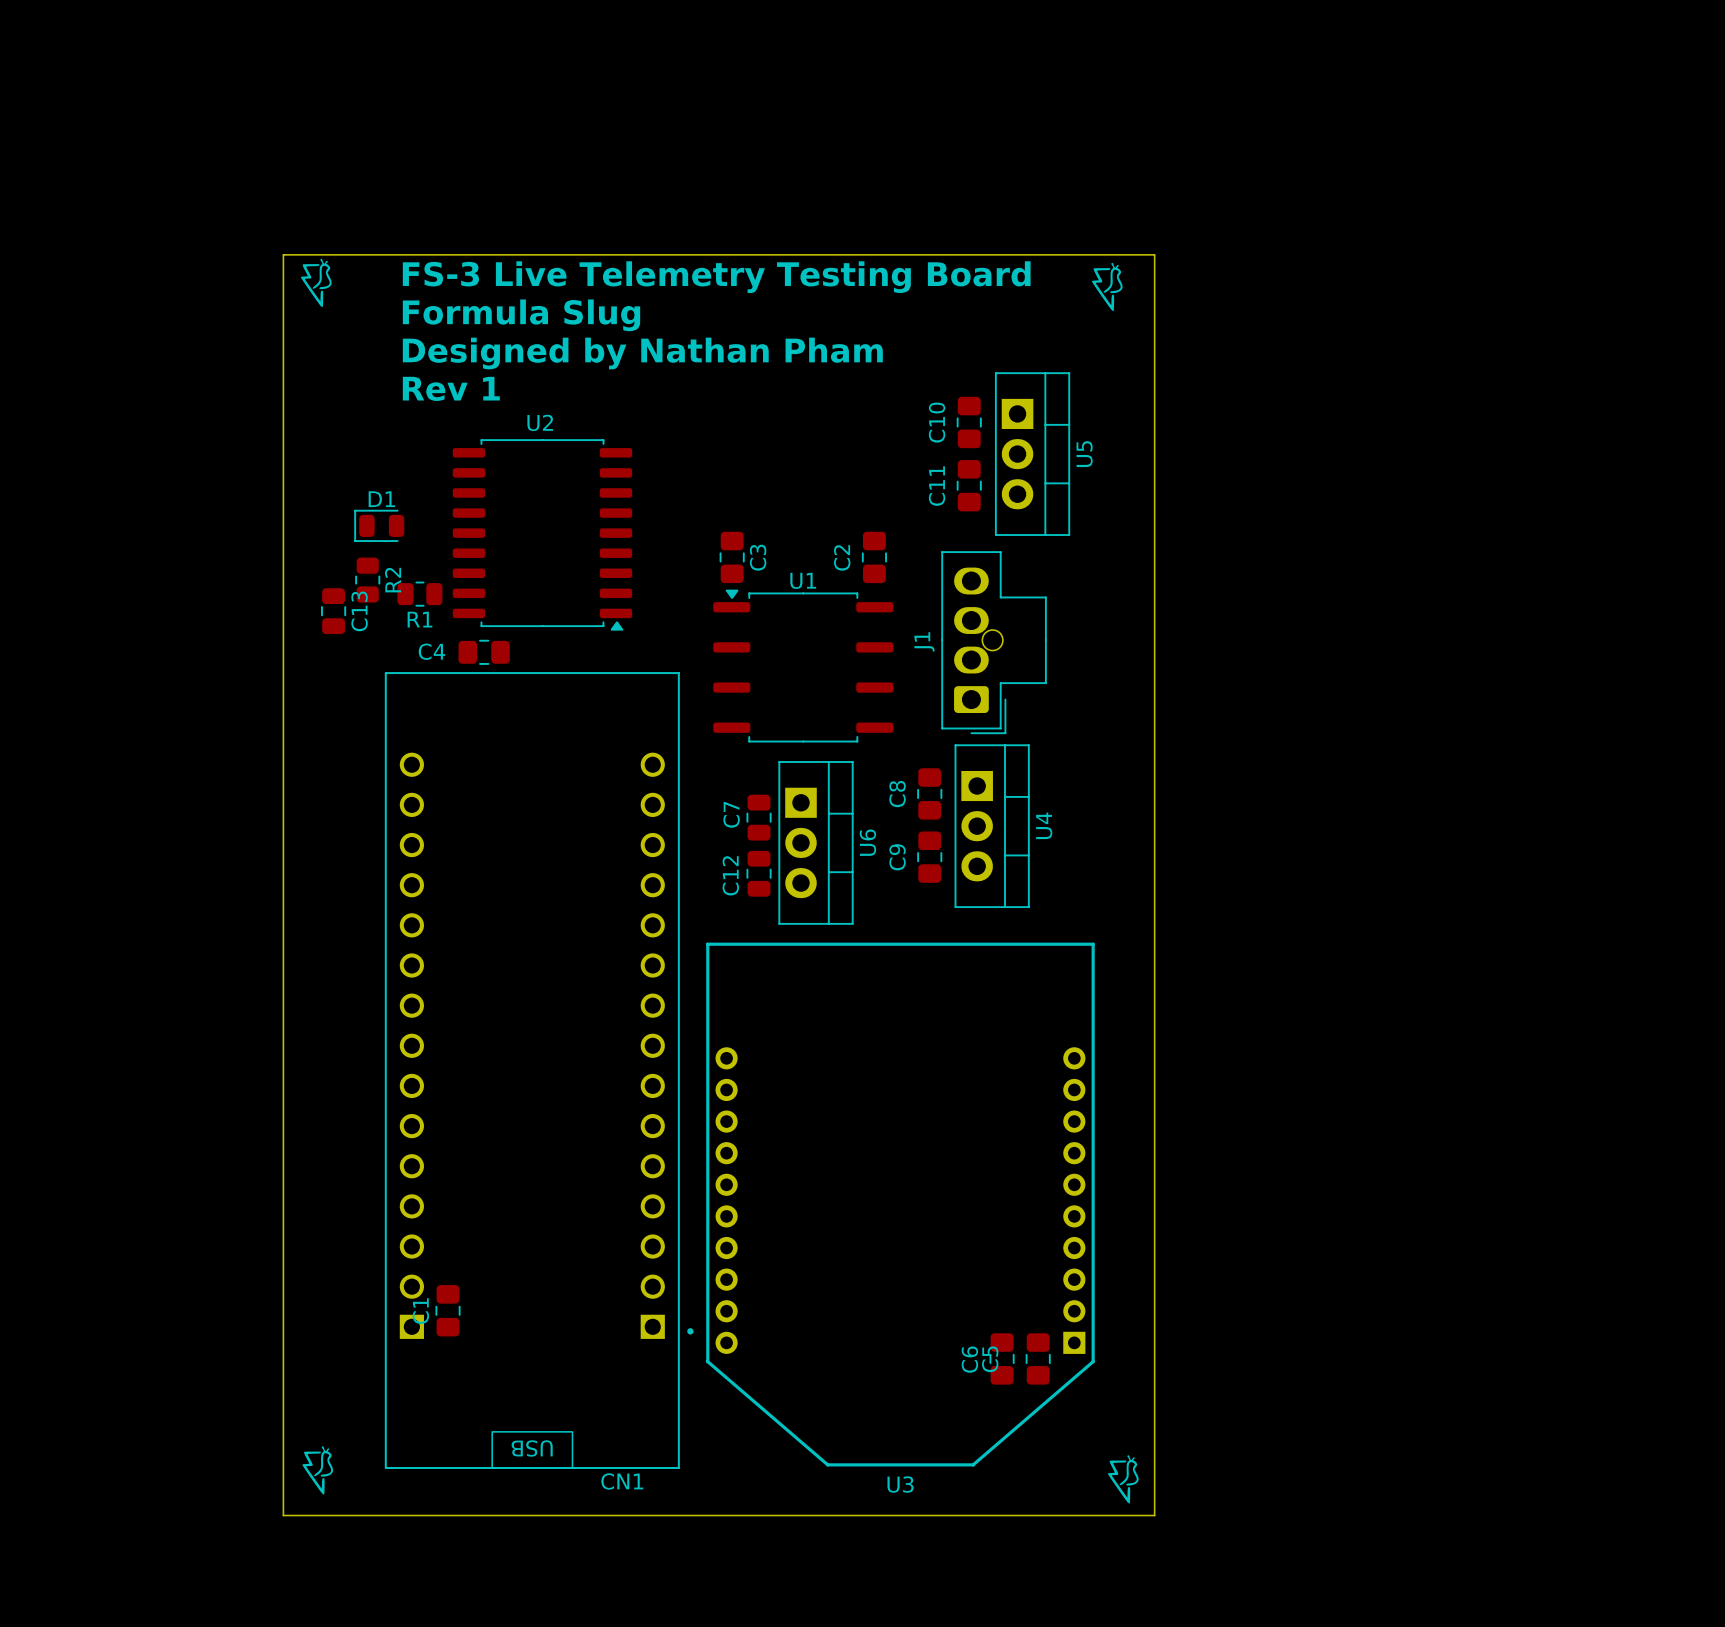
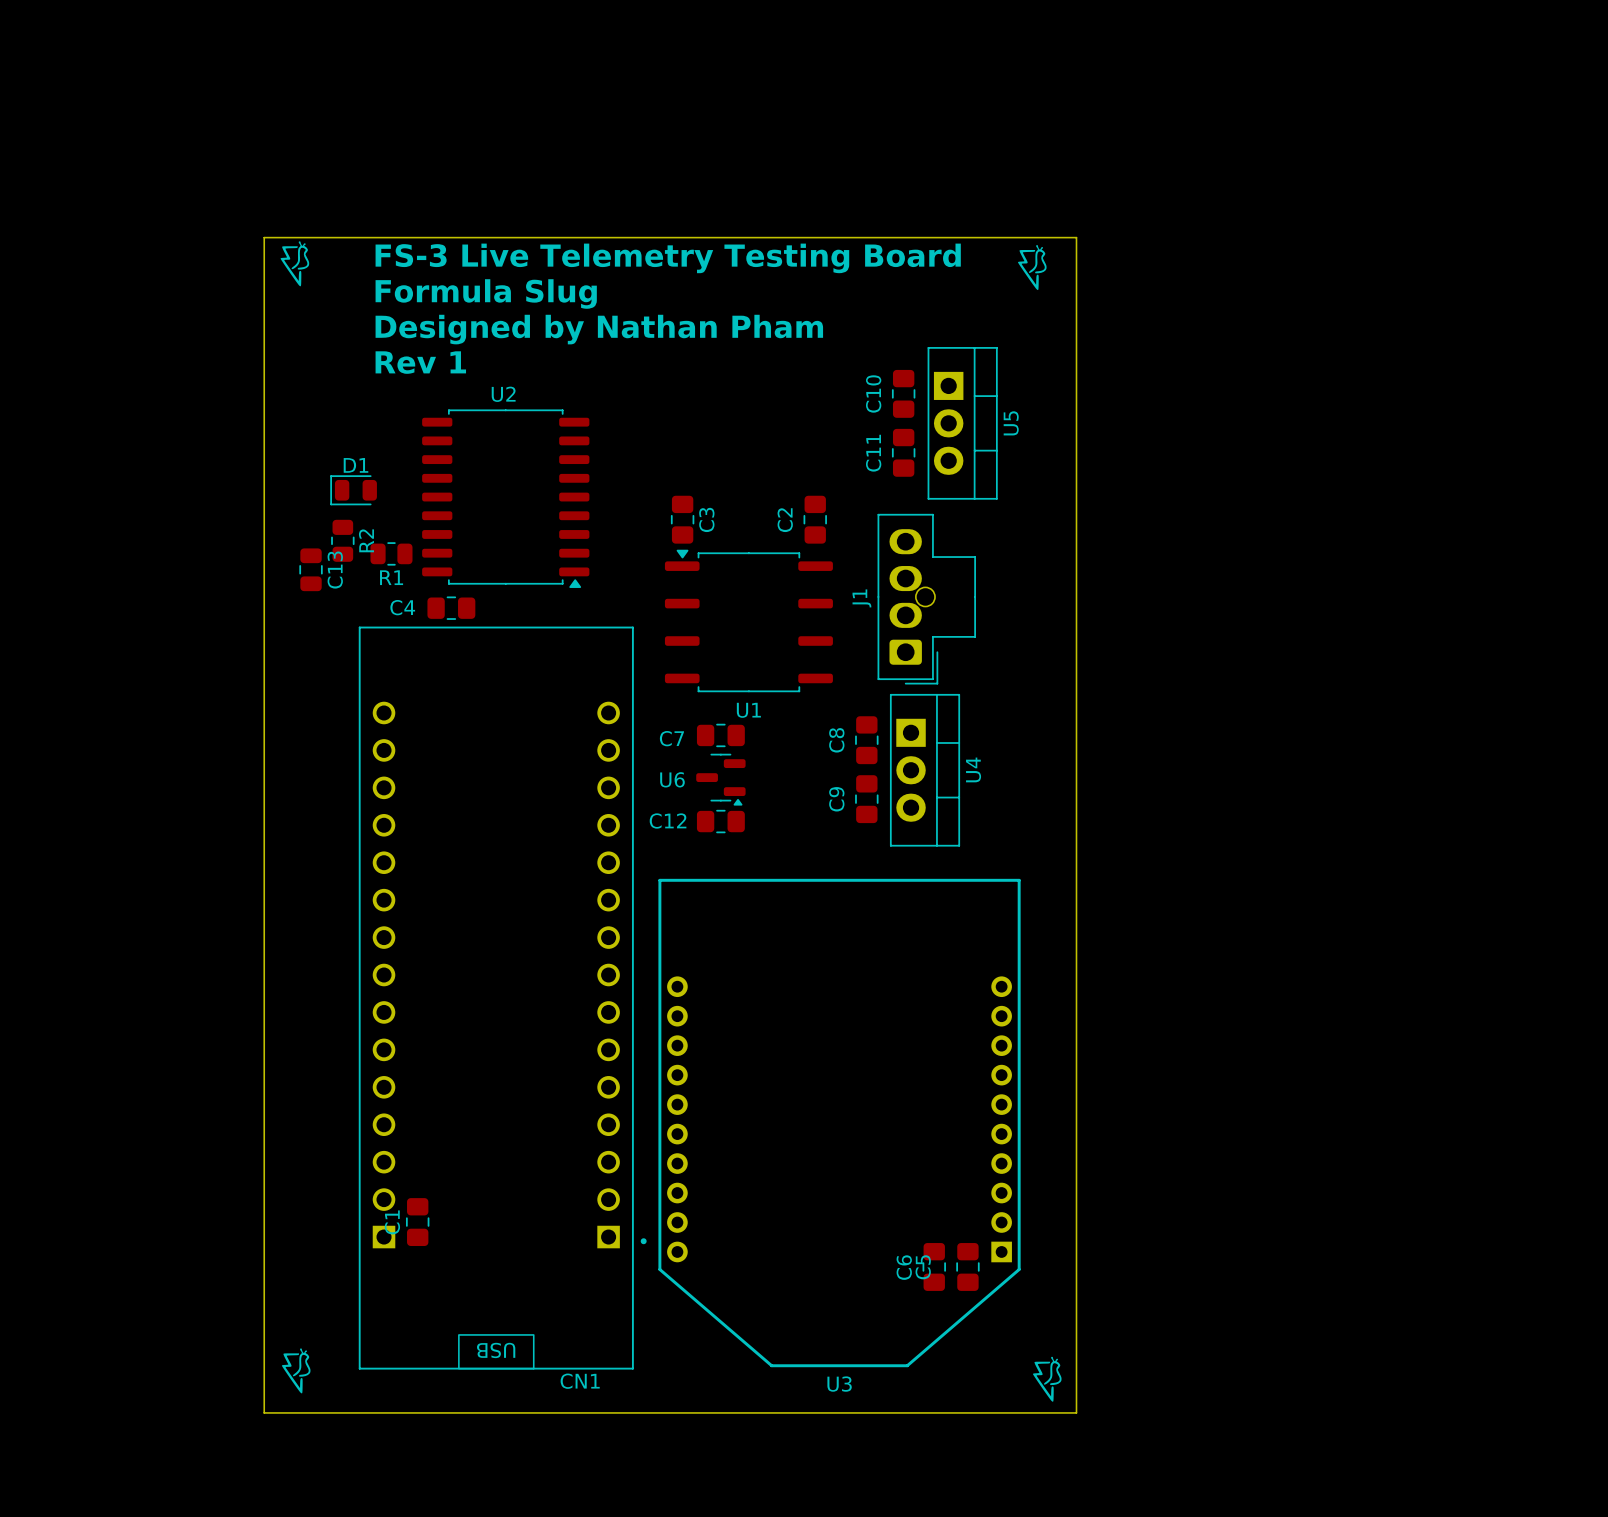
U1 name position: U1 (803, 580) -> U1 (748, 710)
U6 footprint: [778, 761, 854, 925] -> [696, 753, 746, 806]
C7 footprint: [746, 794, 772, 841] -> [696, 723, 745, 748]
U6 name position: U6 (867, 842) -> U6 (672, 779)
C12 footprint: [746, 850, 772, 897] -> [696, 809, 745, 834]

